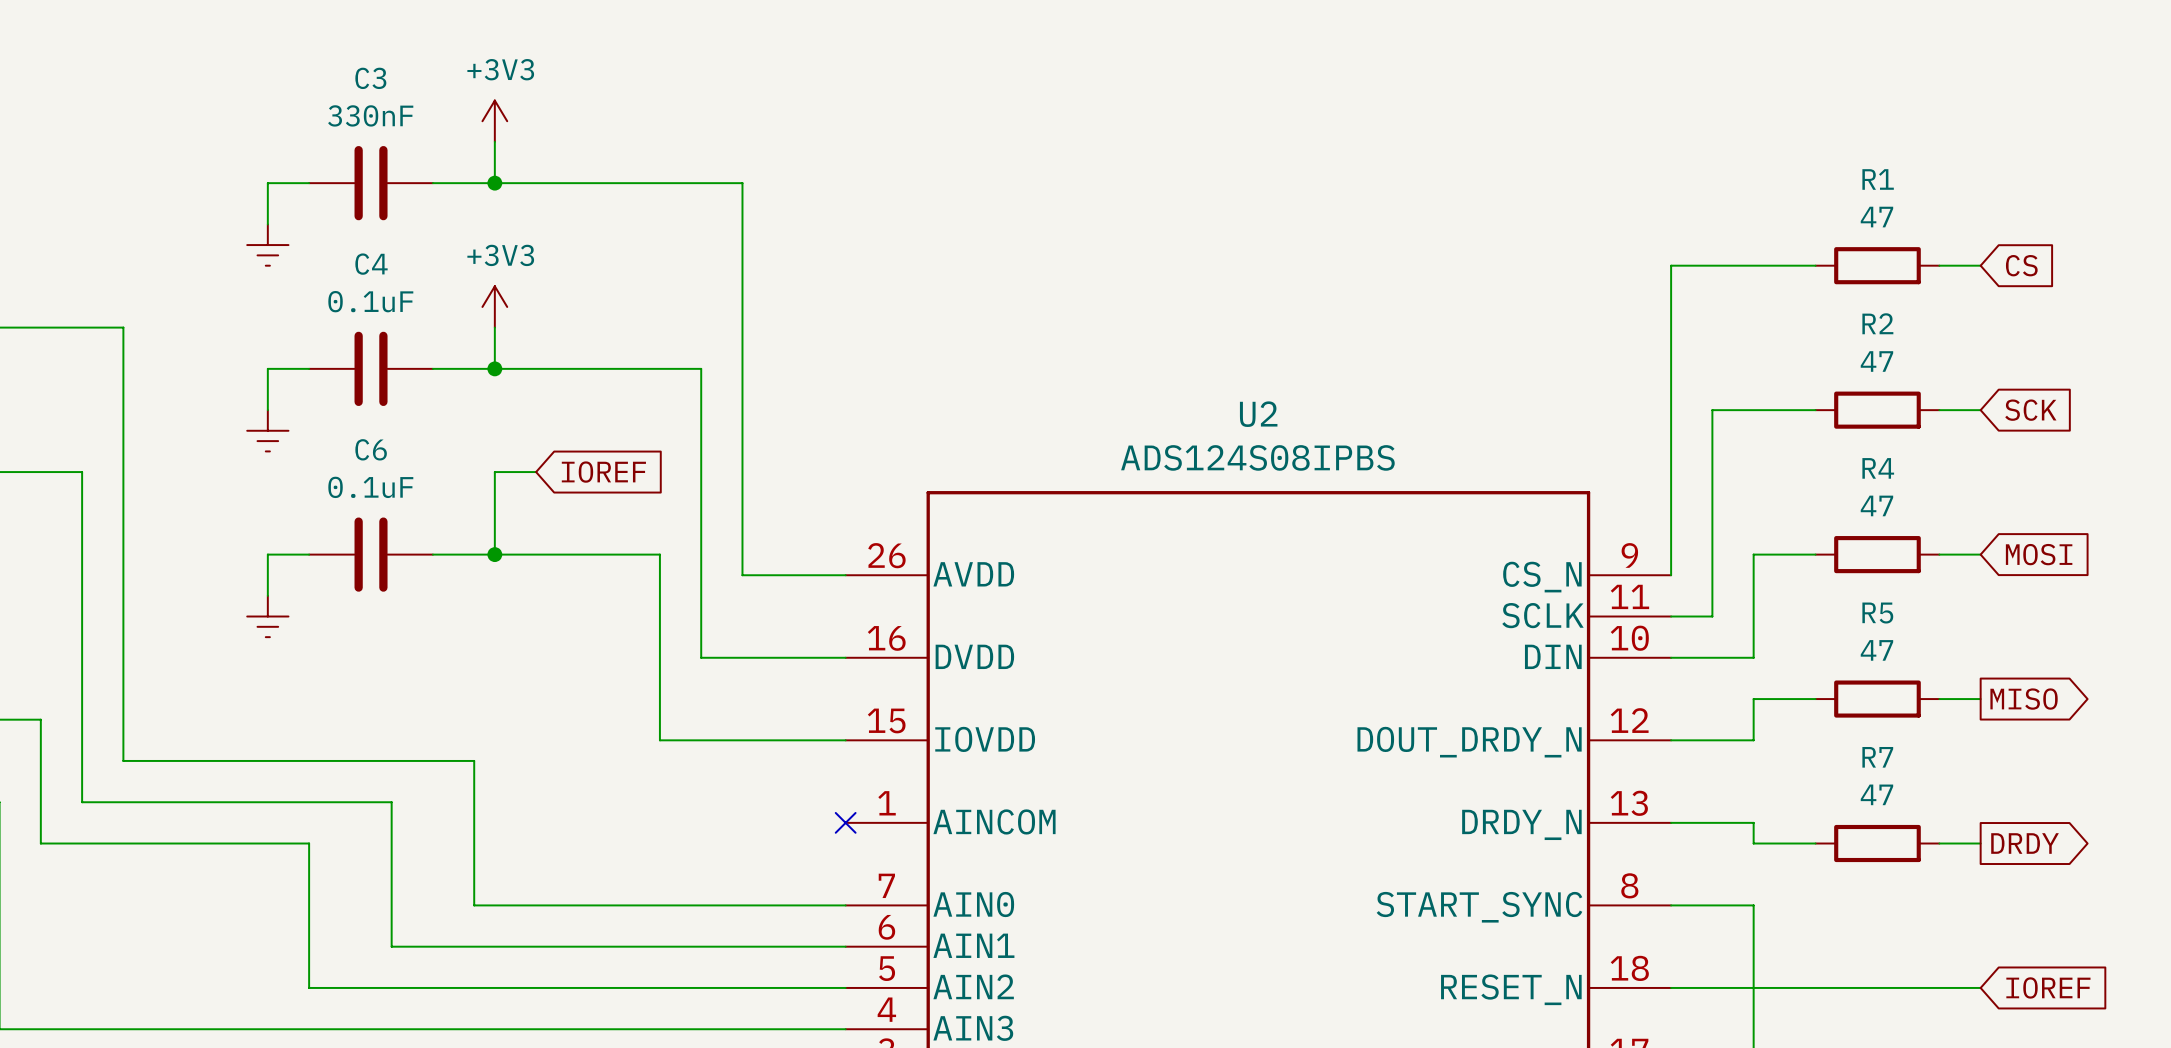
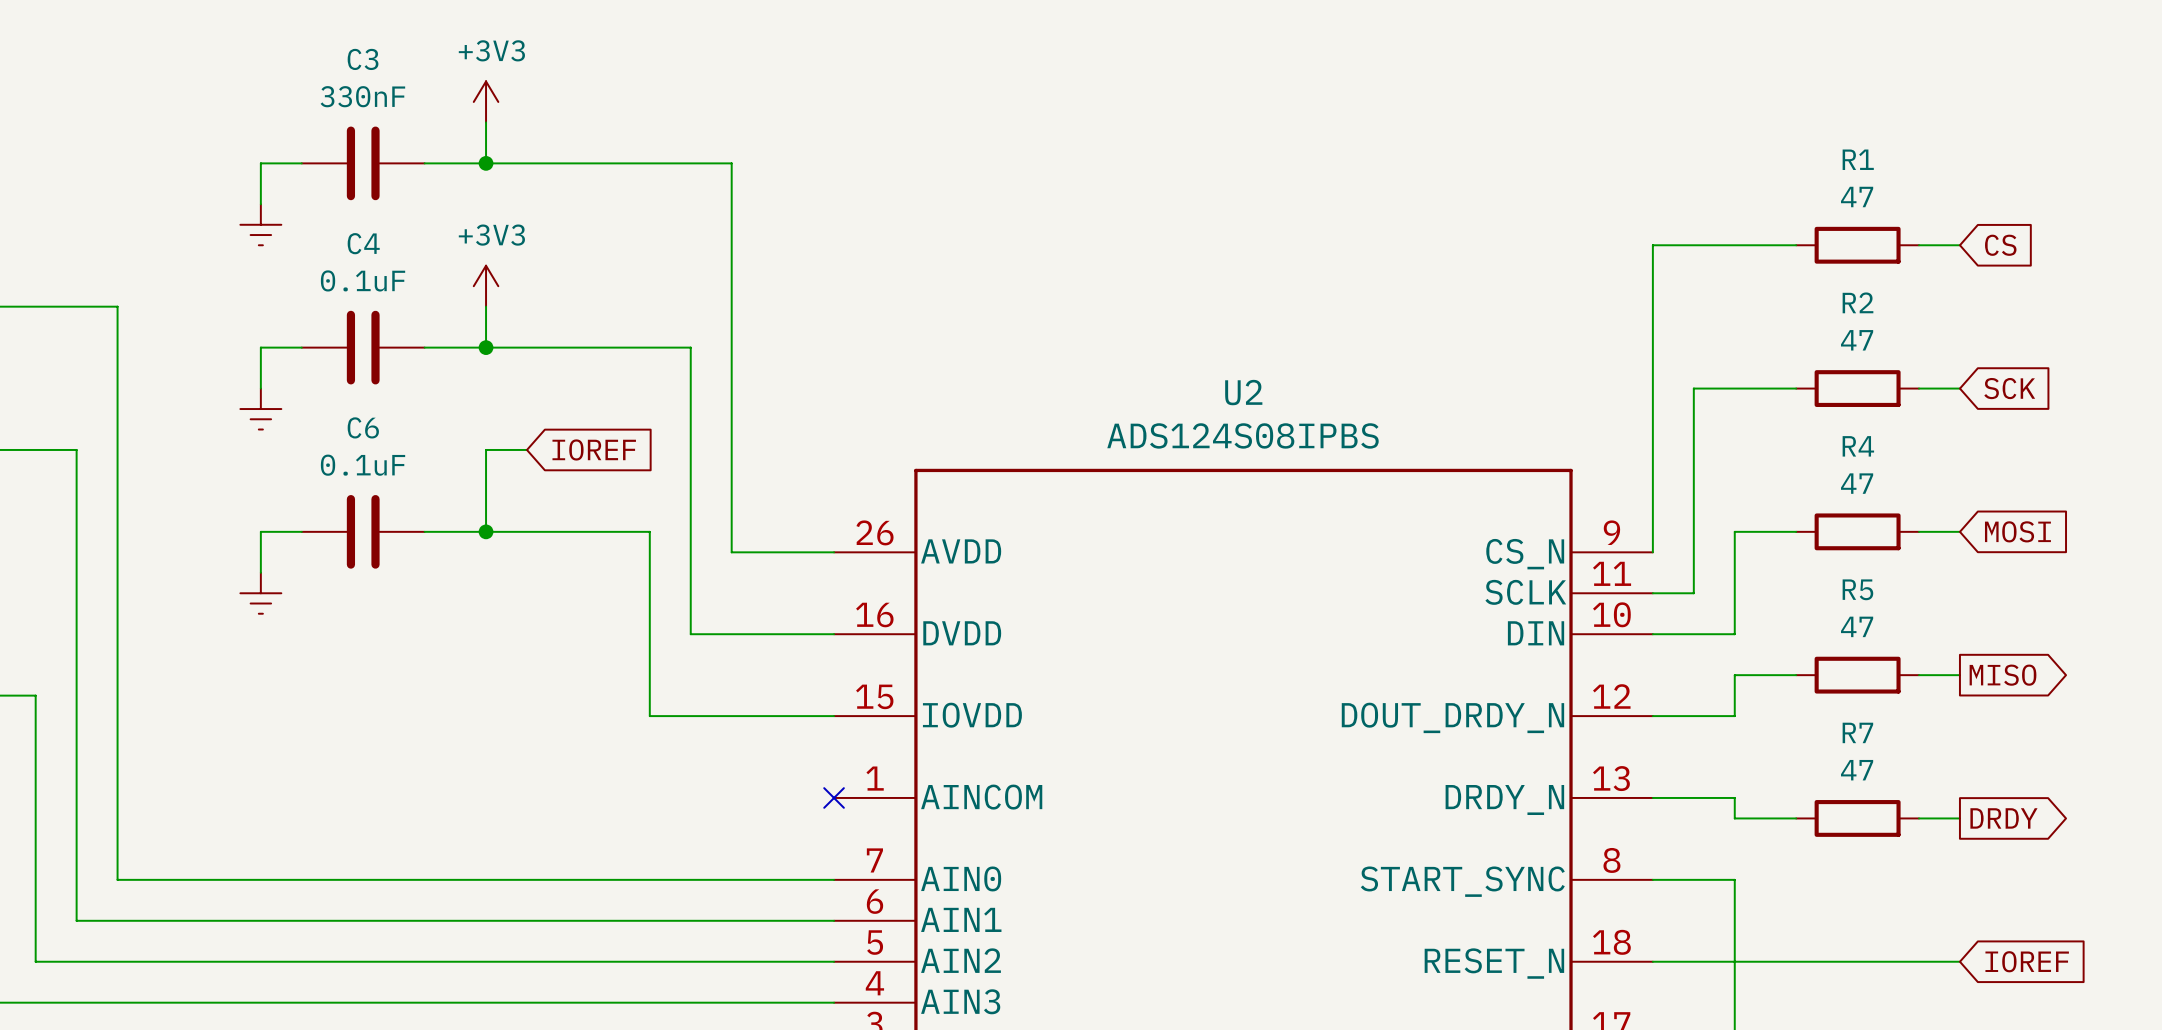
wire: (123, 760) (474, 760) (474, 905) -> (117, 736) (117, 879) (465, 879)
wire: (82, 802) (391, 802) (391, 946) -> (76, 777) (76, 920) (383, 920)
wire: (40, 843) (309, 843) (309, 987) -> (35, 818) (35, 961) (301, 961)

